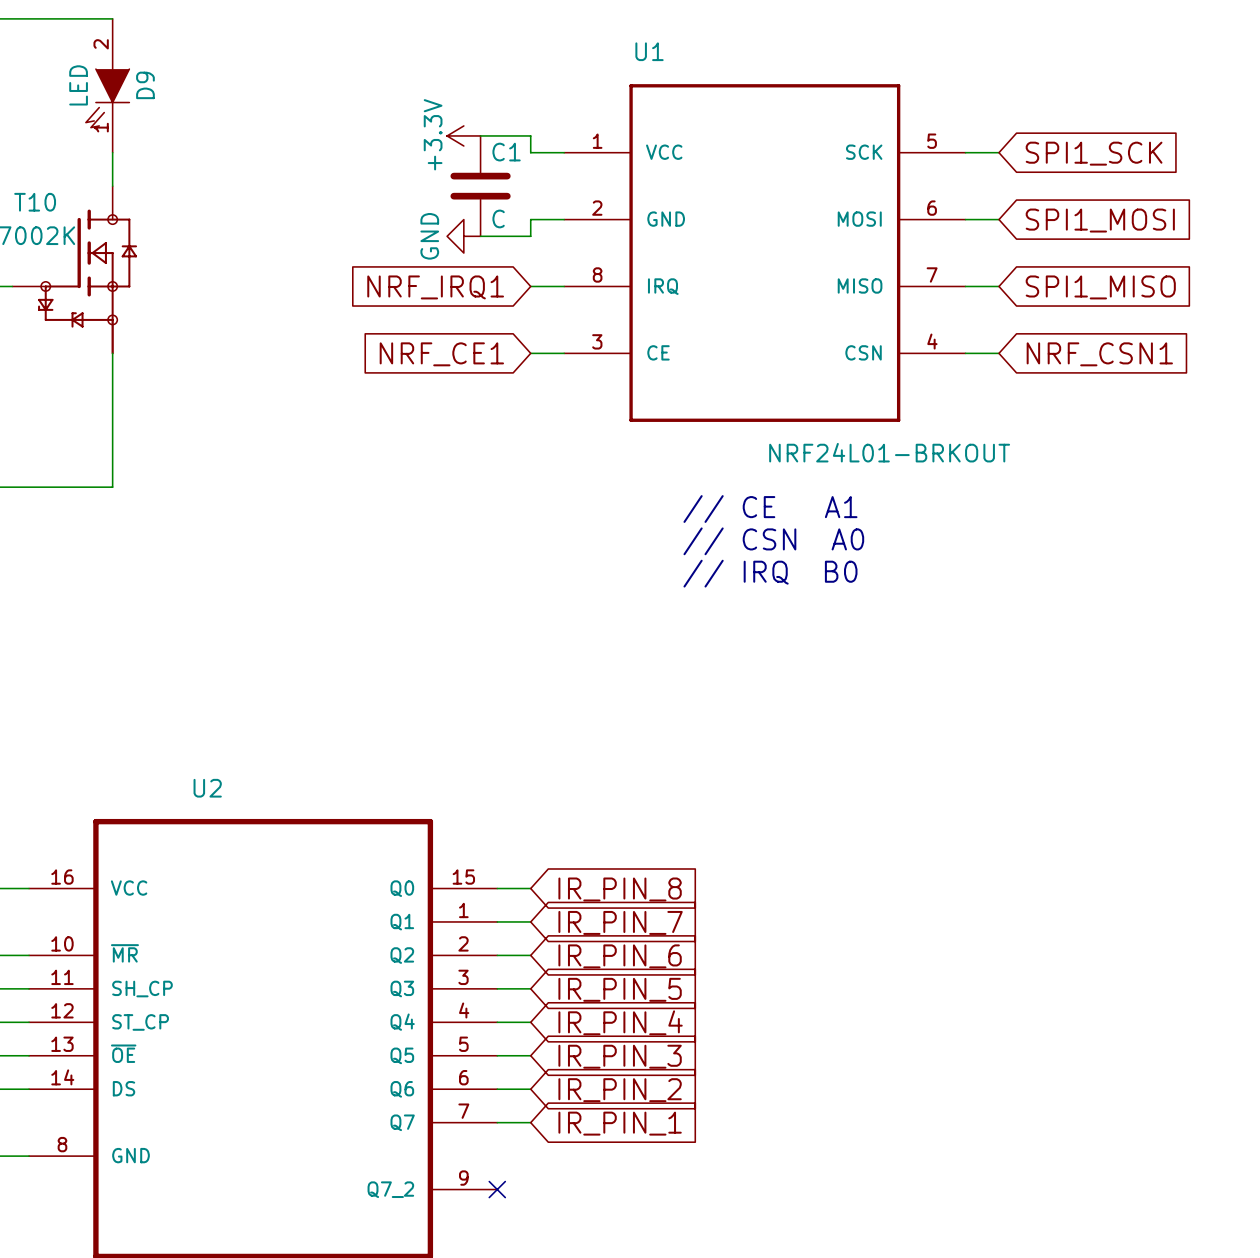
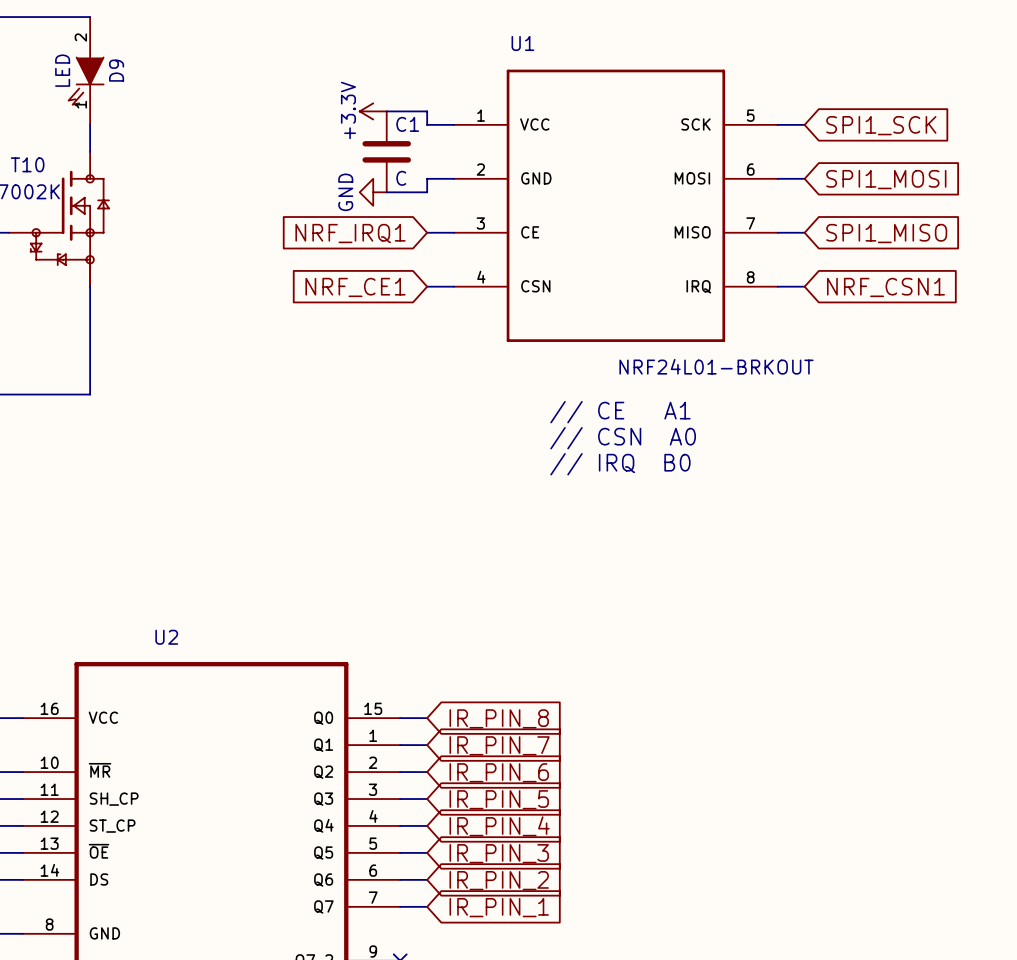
U1 pin number: 8 (597, 274) -> 3 (480, 223)
U1 pin name: IRQ (663, 286) -> CE (530, 232)
U1 pin number: 3 (597, 341) -> 4 (481, 277)
U1 pin number: 4 (932, 341) -> 8 (750, 277)
U1 pin name: CE (658, 352) -> CSN (535, 286)
U1 pin name: CSN (863, 352) -> IRQ (698, 286)

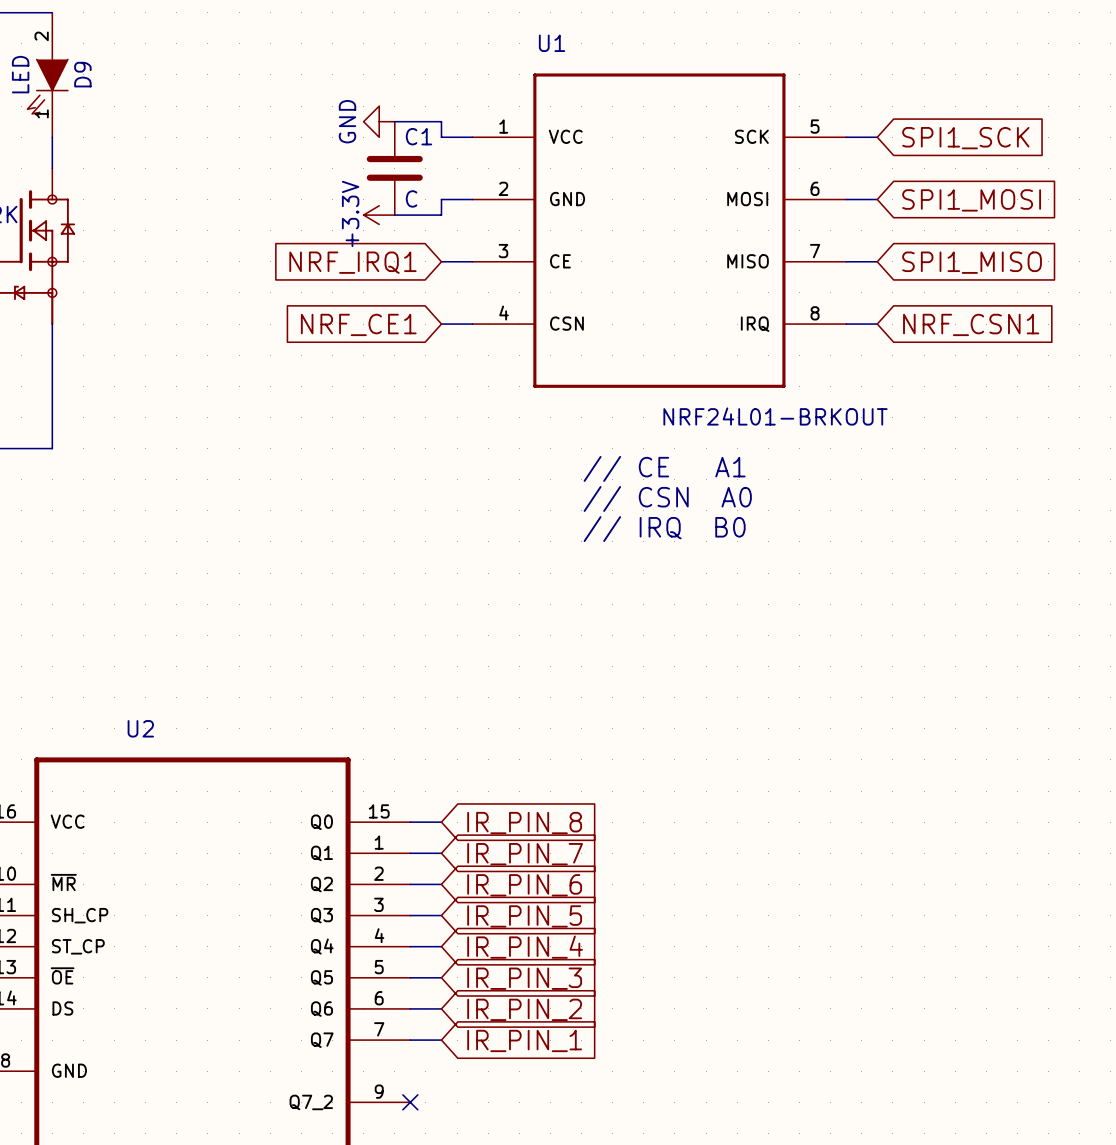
power symbol: +3.3V (373, 111) -> GND (379, 121)
power symbol: GND (373, 192) -> +3.3V (379, 215)

